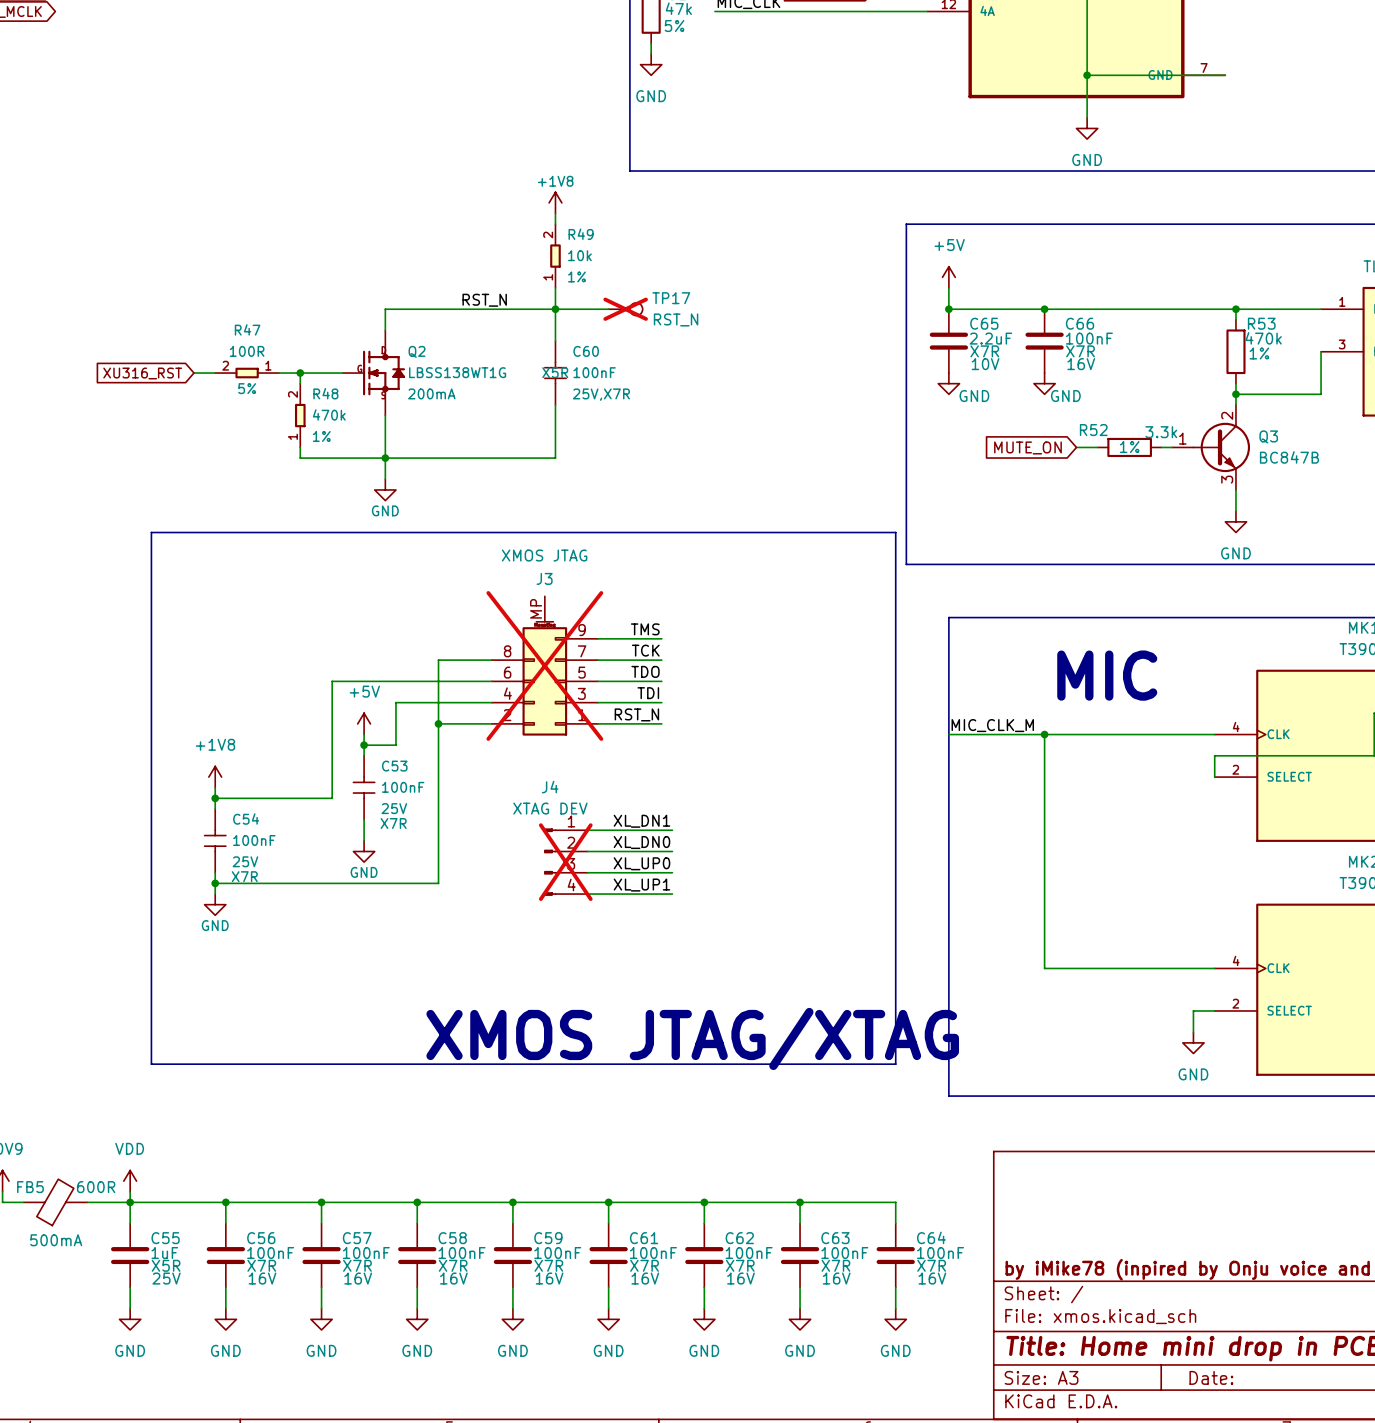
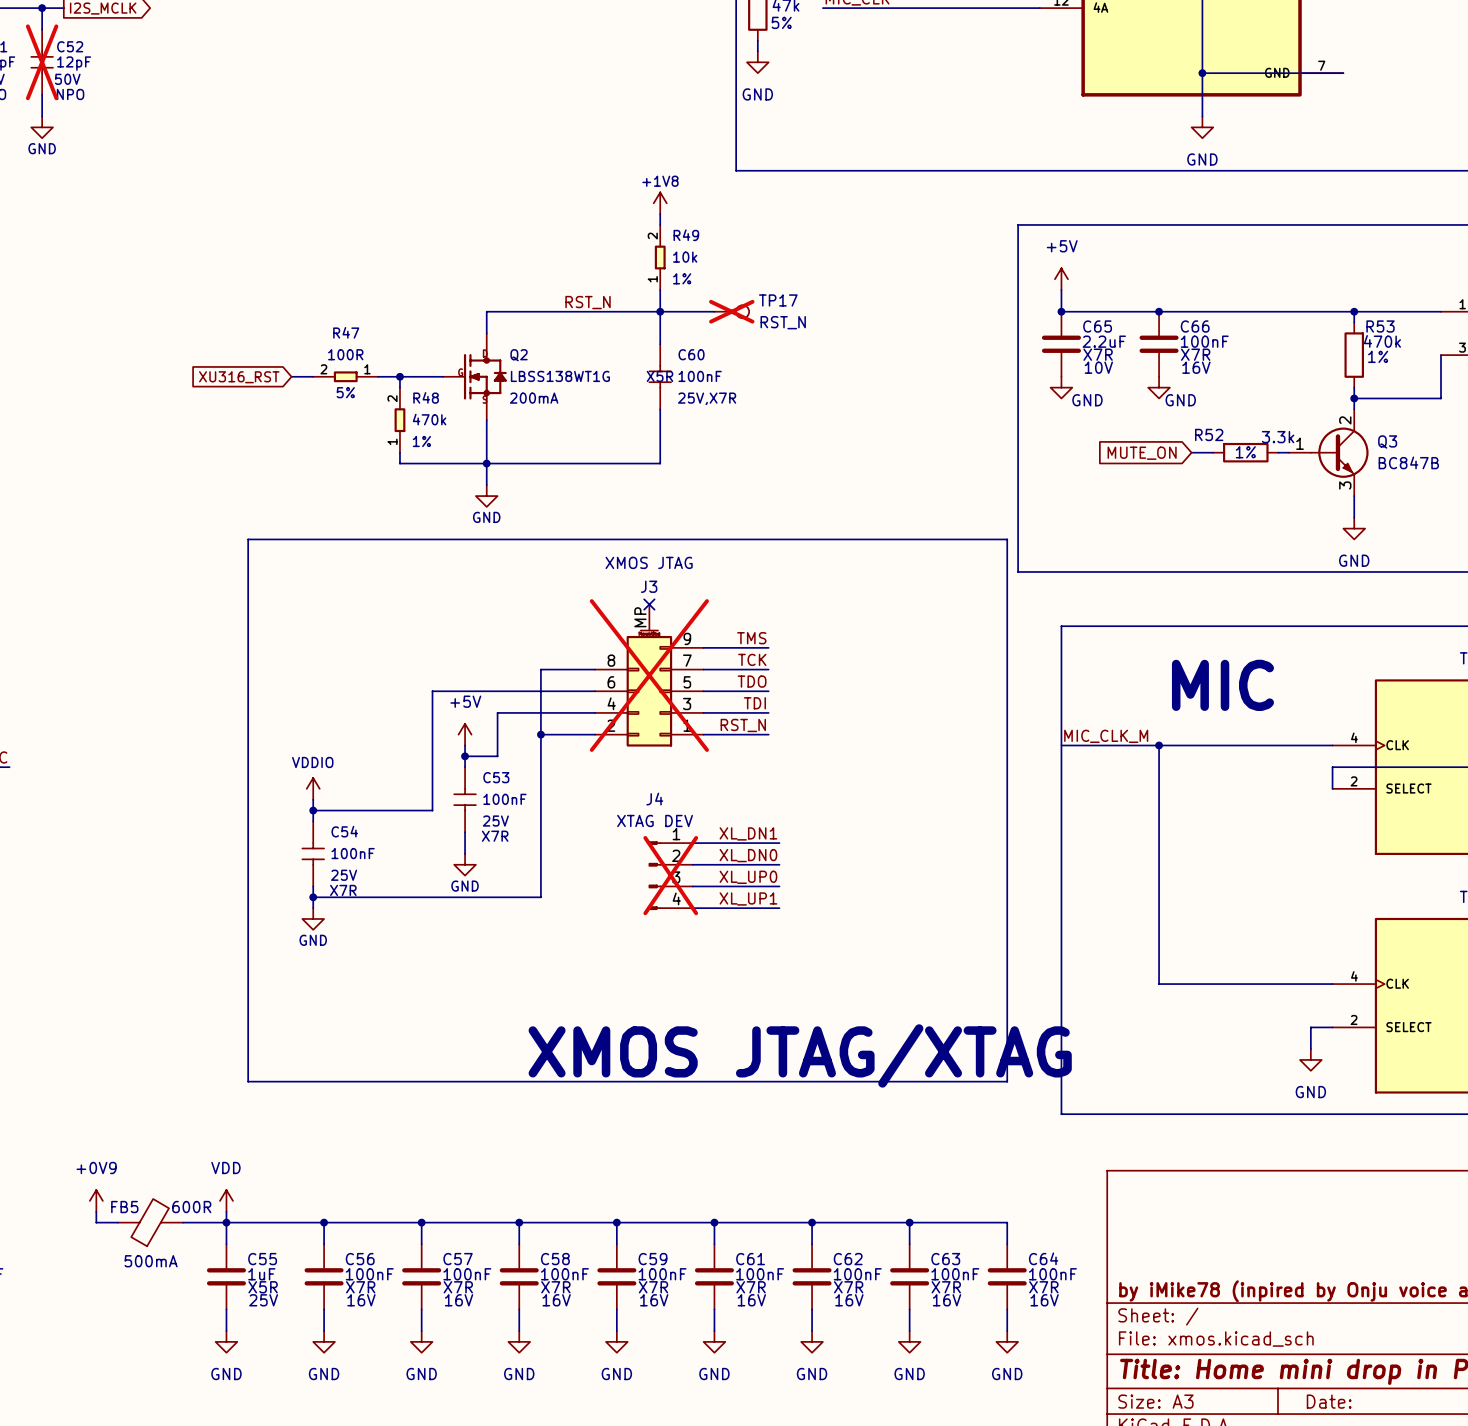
no-connect mark: none -> (649, 604)
power symbol: +1V8 (215, 777) -> VDDIO (313, 788)

